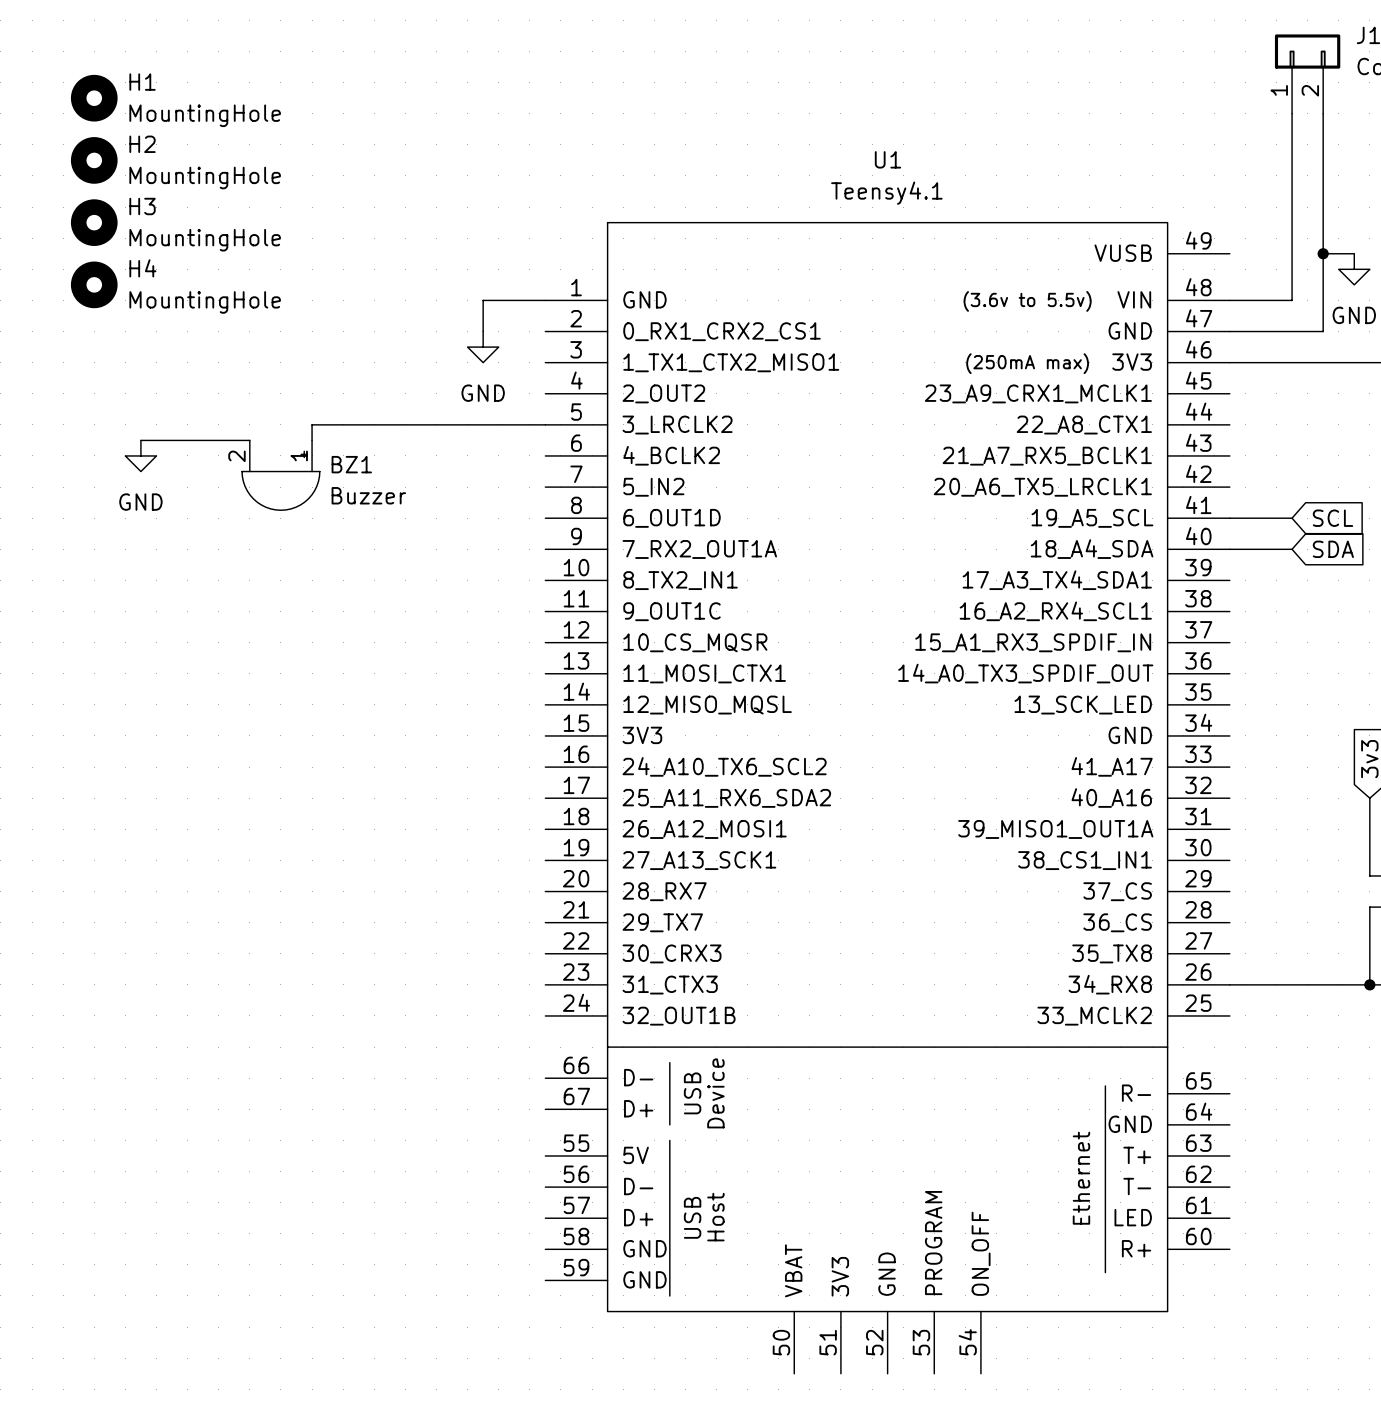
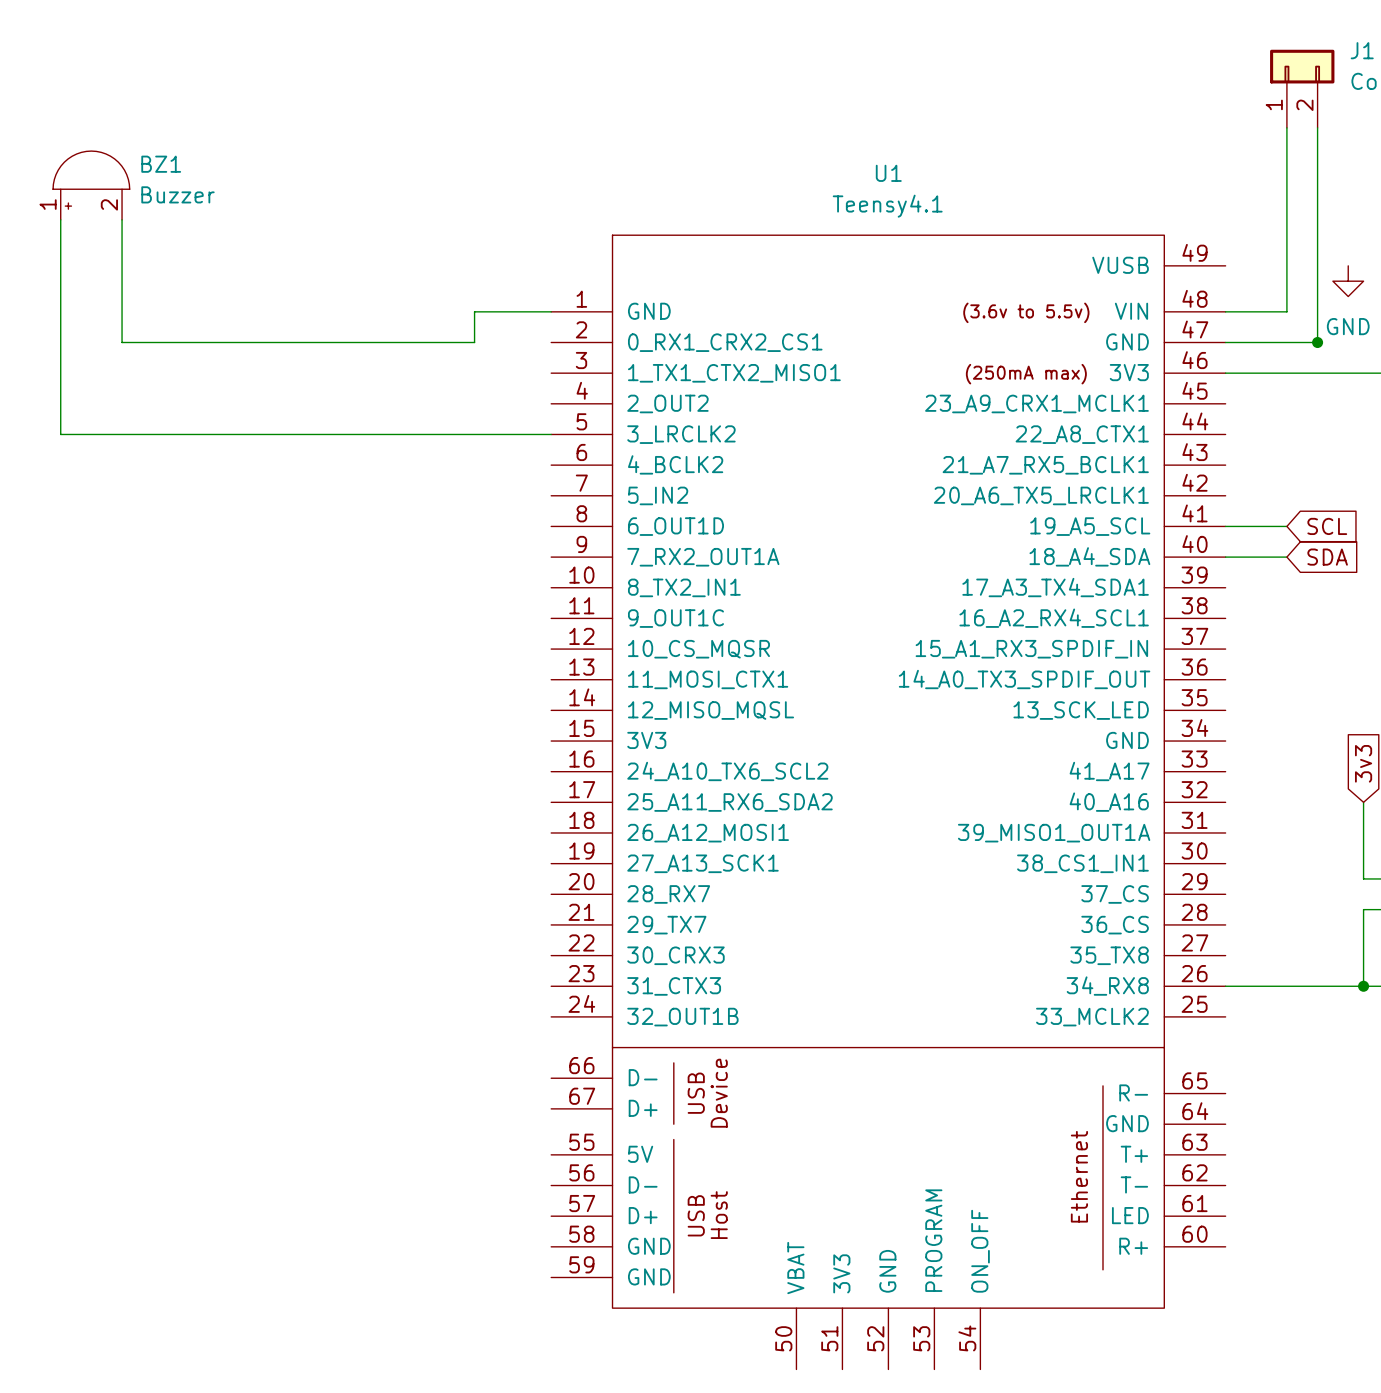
H1: MountingHole (94, 98) -> none
H2: MountingHole (94, 160) -> none
H3: MountingHole (94, 222) -> none
wire: (1323, 253) (1354, 253) -> none
junction: (1323, 253) -> none
H4: MountingHole (94, 284) -> none
wire: (483, 300) (483, 331) -> (489, 311) (474, 311) (474, 342) (122, 342) (122, 219)
junction: none -> (1317, 342)
power symbol: GND (483, 347) -> none
wire: (312, 424) (312, 440) -> (321, 434) (60, 434) (60, 219)
wire: (140, 440) (249, 440) -> none
power symbol: GND (140, 455) -> none
BZ1 position: (280, 475) -> (91, 185)
BZ1 rotation: 0° (280, 480) -> 180° (91, 180)

